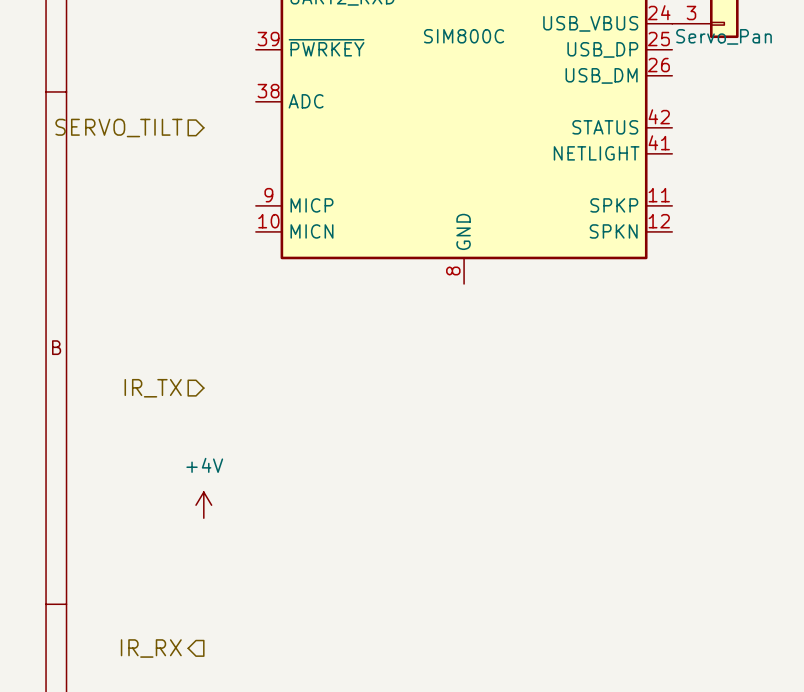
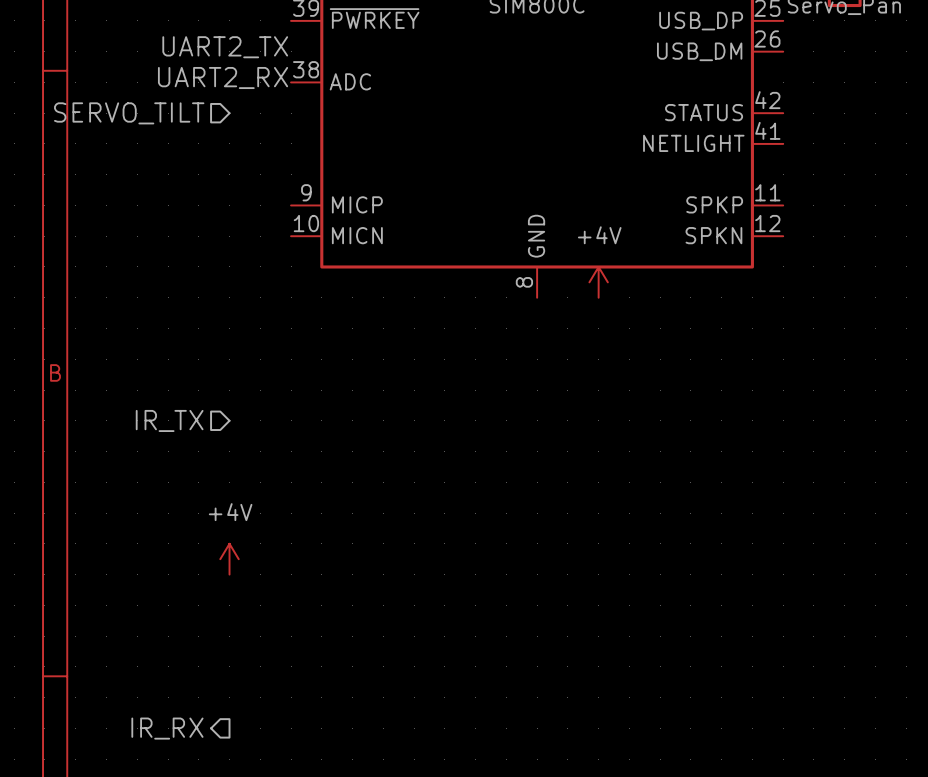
label: none -> UART2_TX (225, 47)
label: none -> UART2_RX (223, 78)
power symbol: none -> +4V (598, 282)

